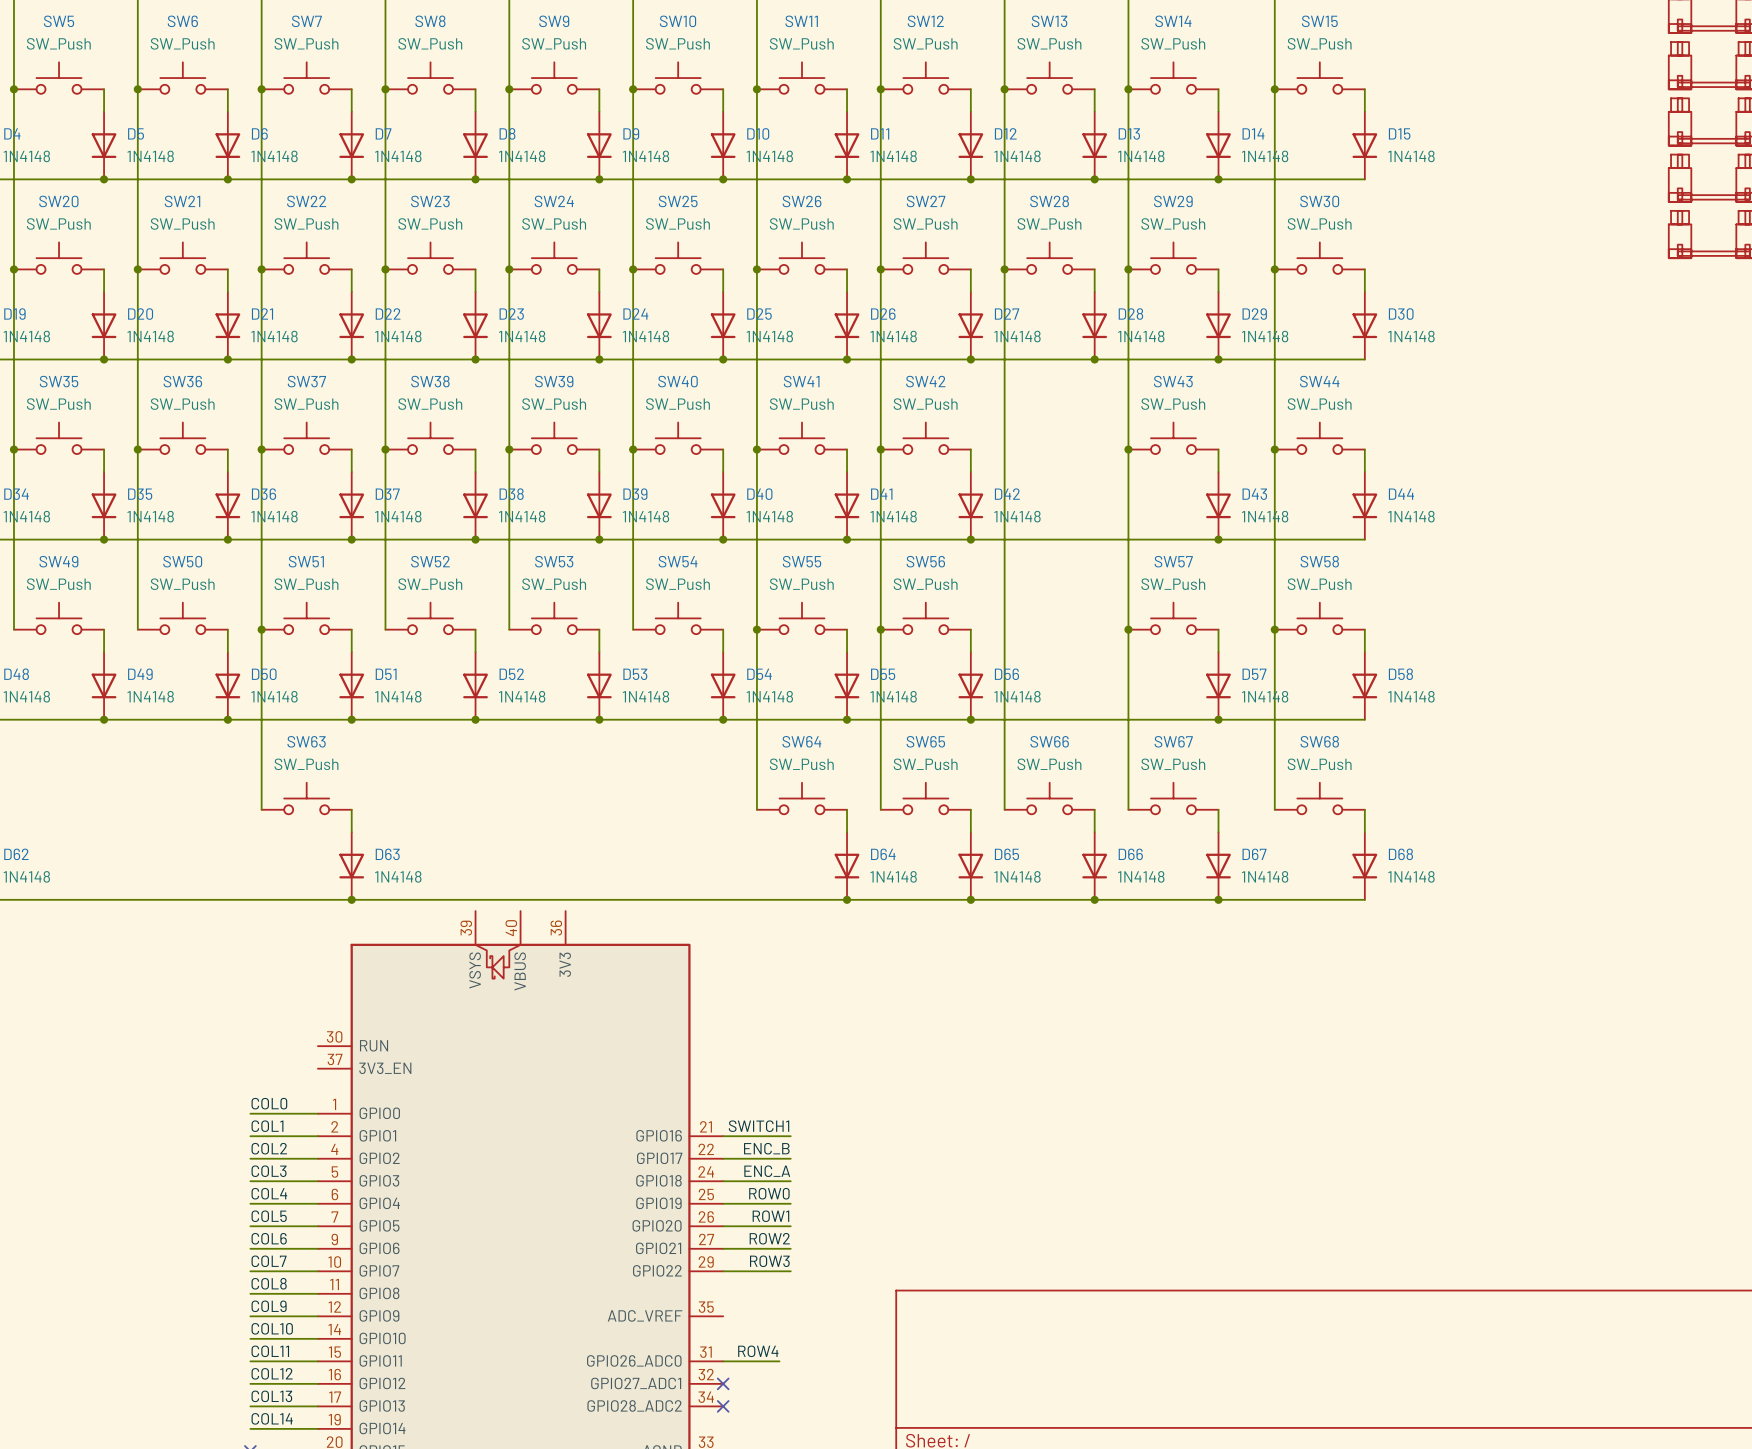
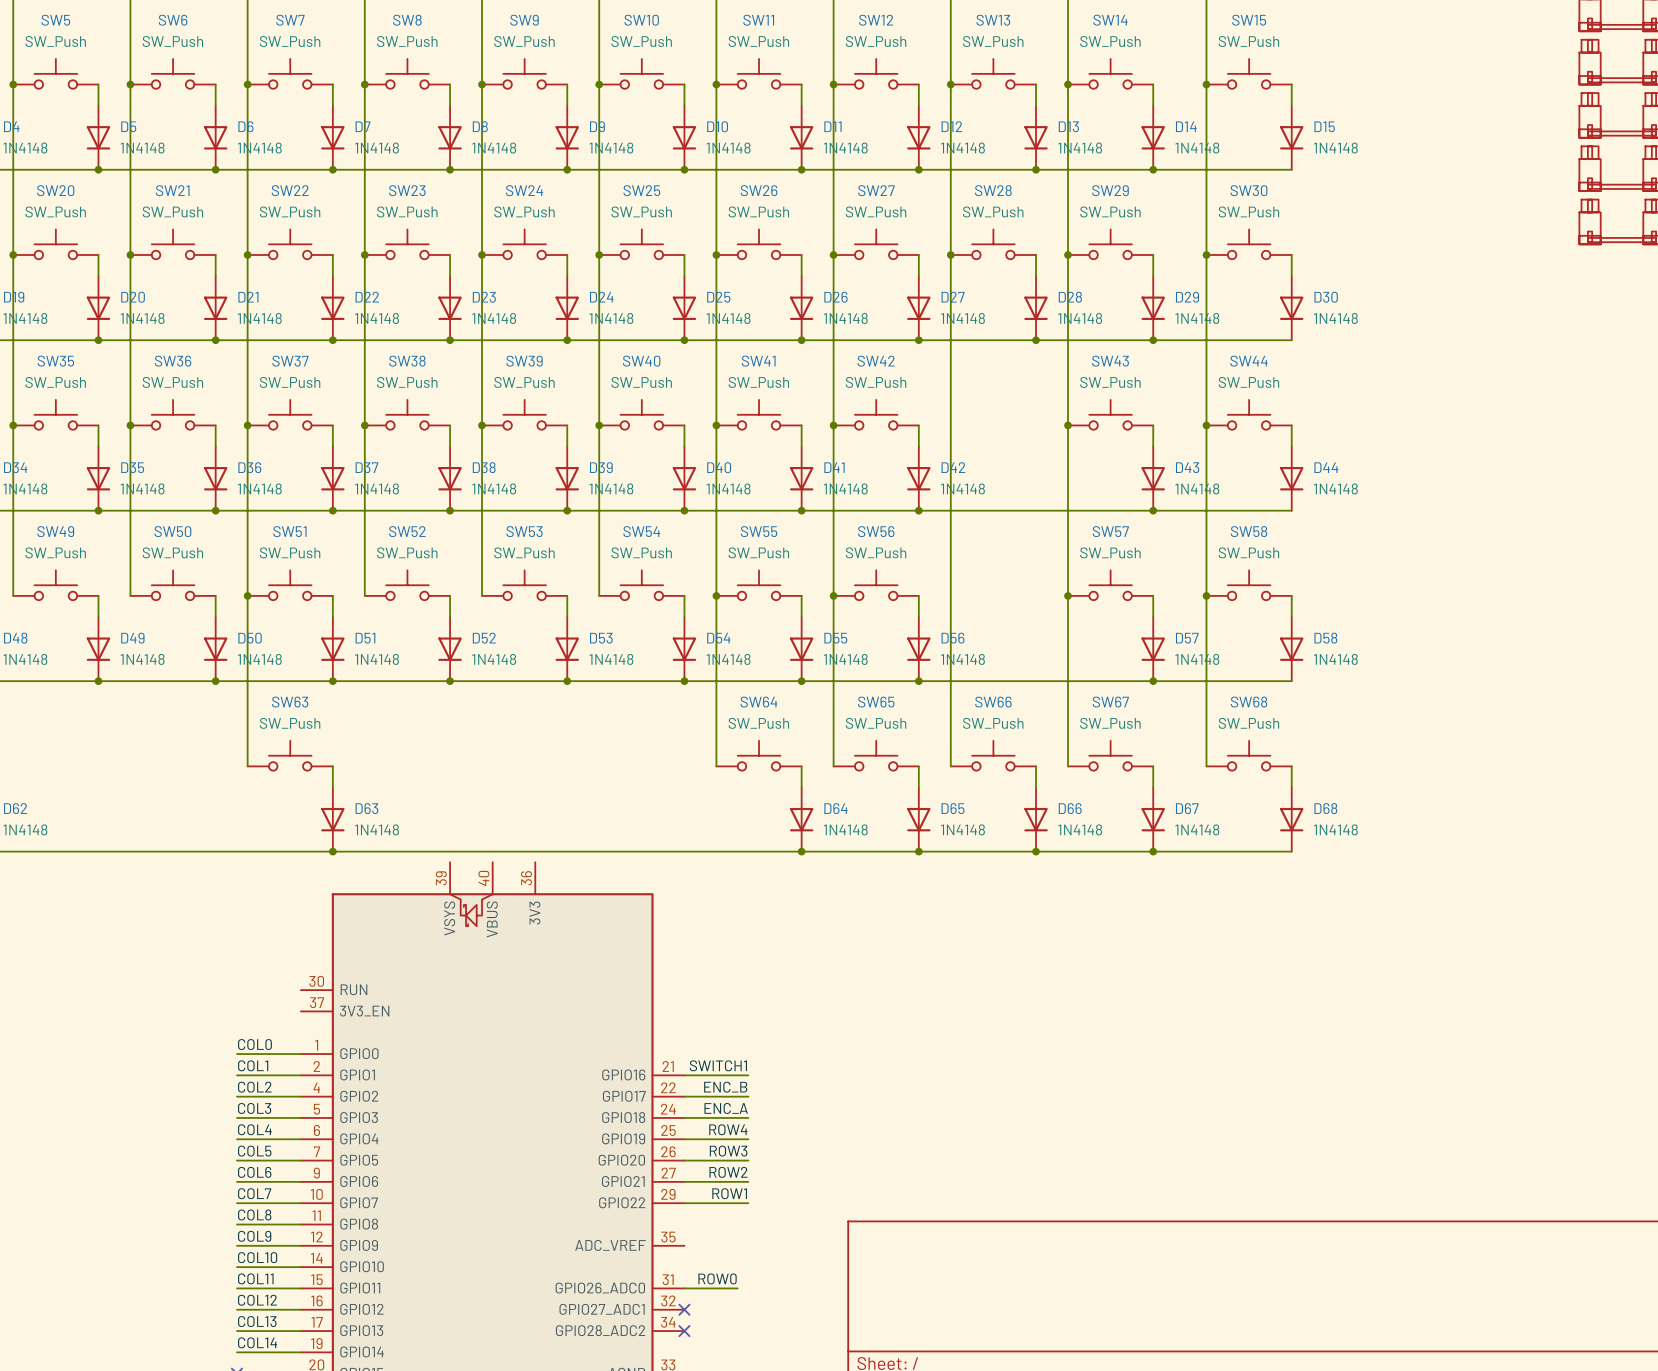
label: ROW0 (769, 1193) -> ROW4 (728, 1129)
label: ROW1 (770, 1216) -> ROW3 (728, 1151)
label: ROW3 (769, 1261) -> ROW1 (729, 1193)
label: ROW4 (758, 1351) -> ROW0 (717, 1278)

